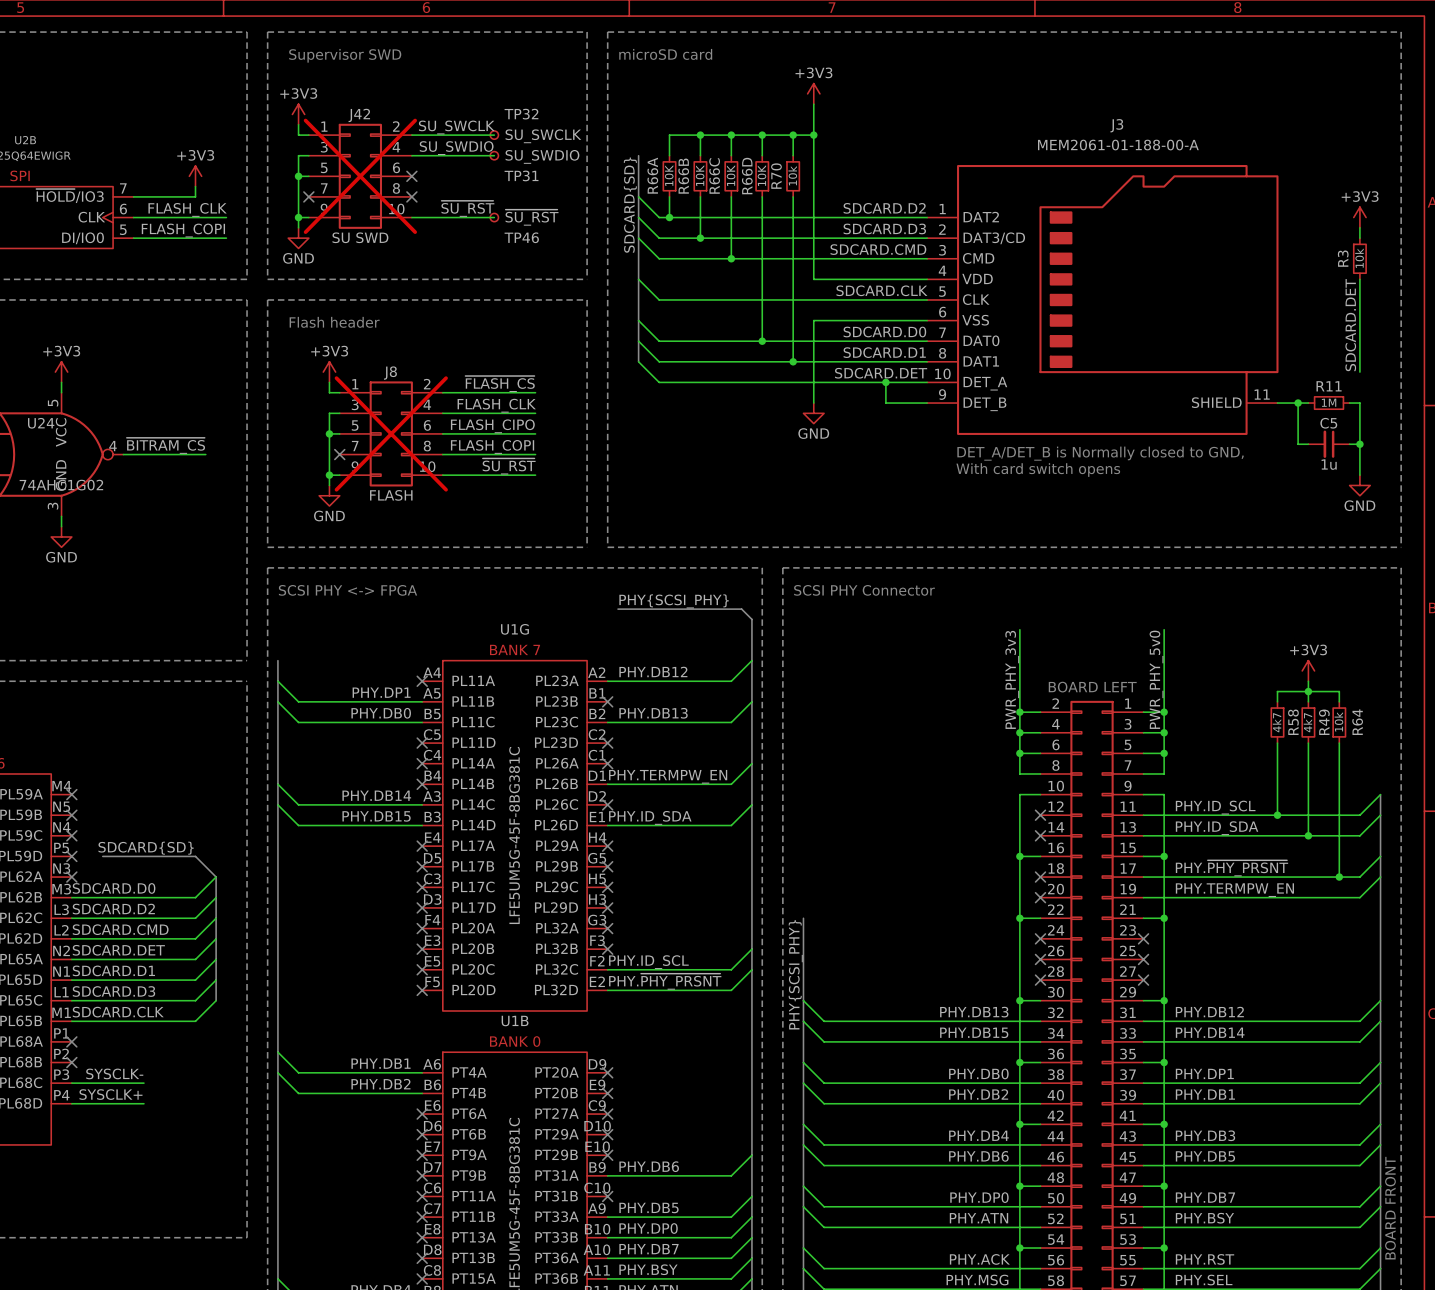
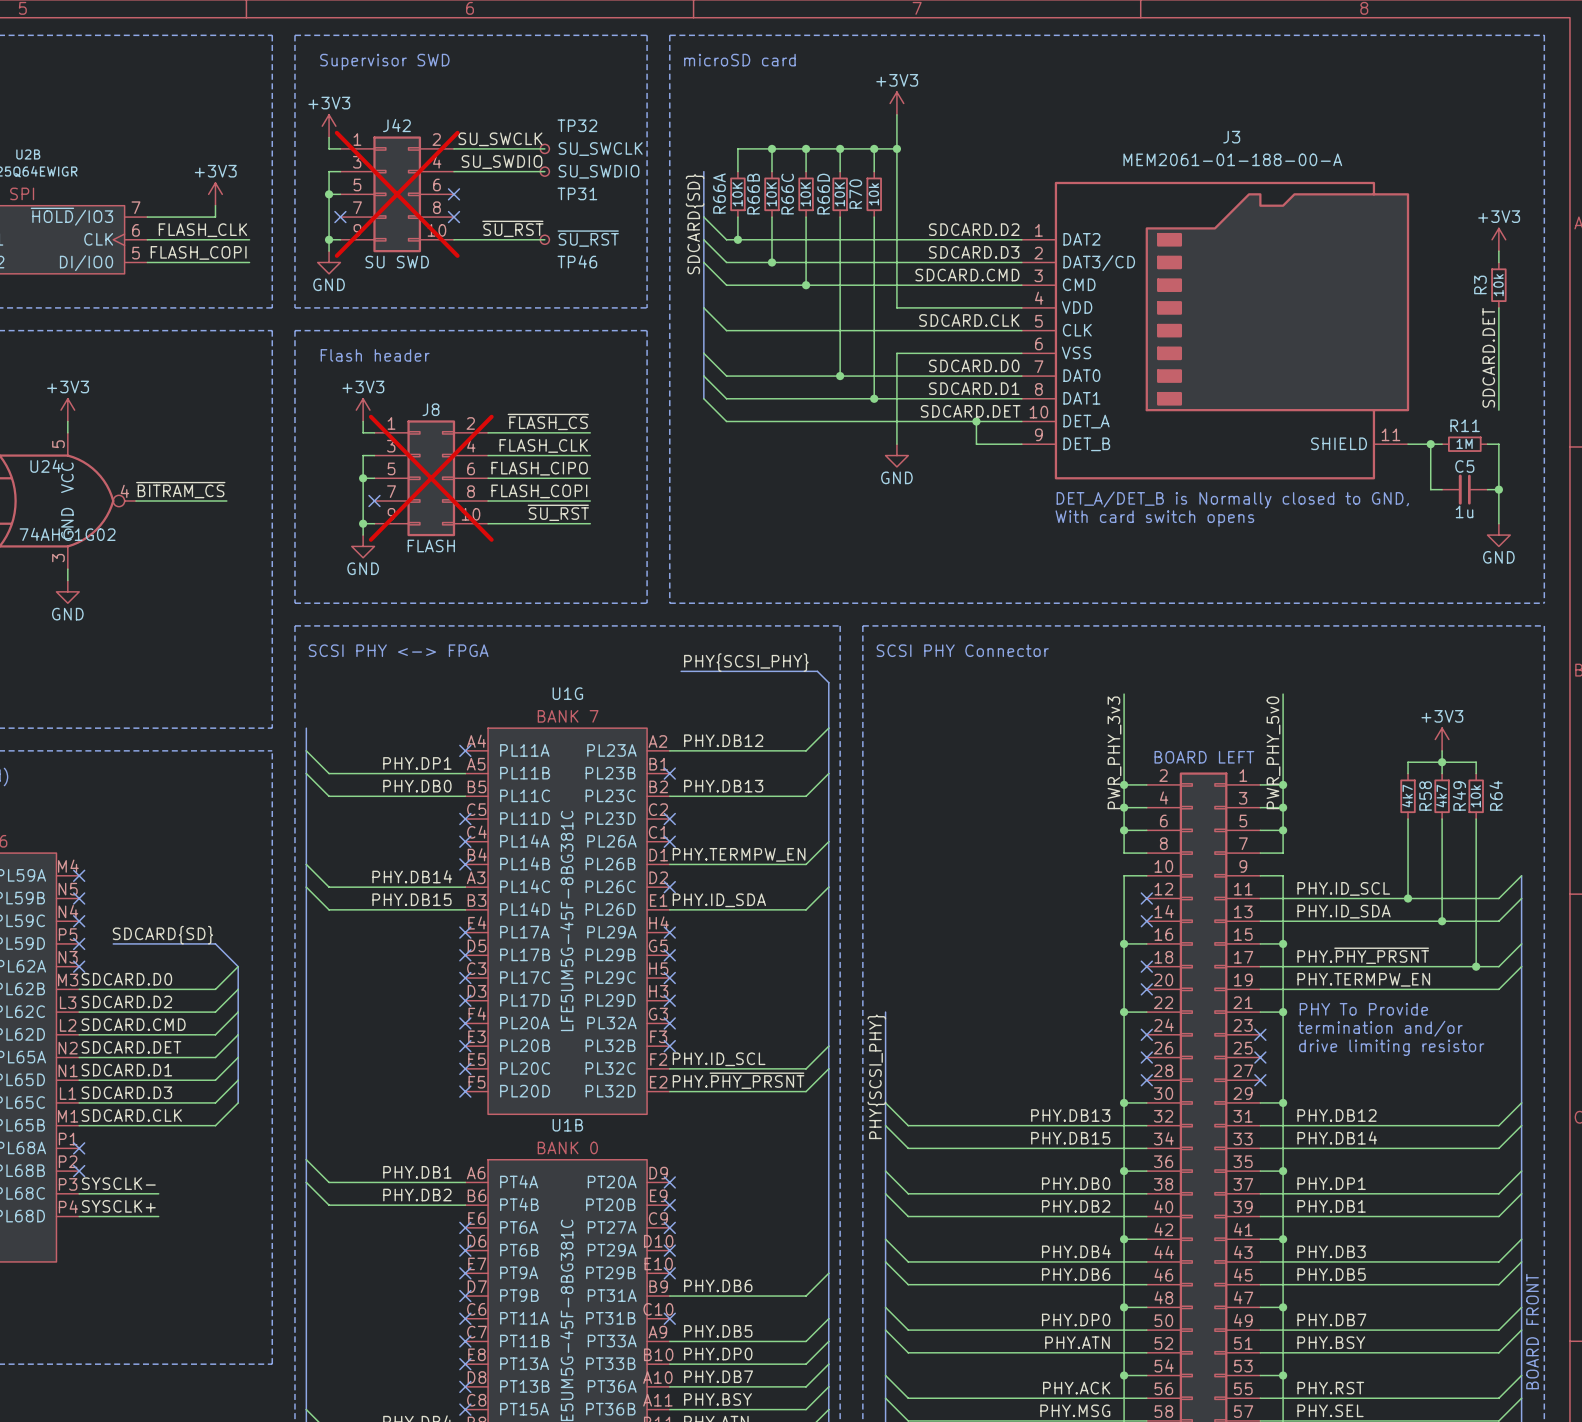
text: none -> PHY To Provide (1363, 1009)
text: none -> termination and/or (1380, 1028)
text: none -> drive limiting resistor (1391, 1047)

